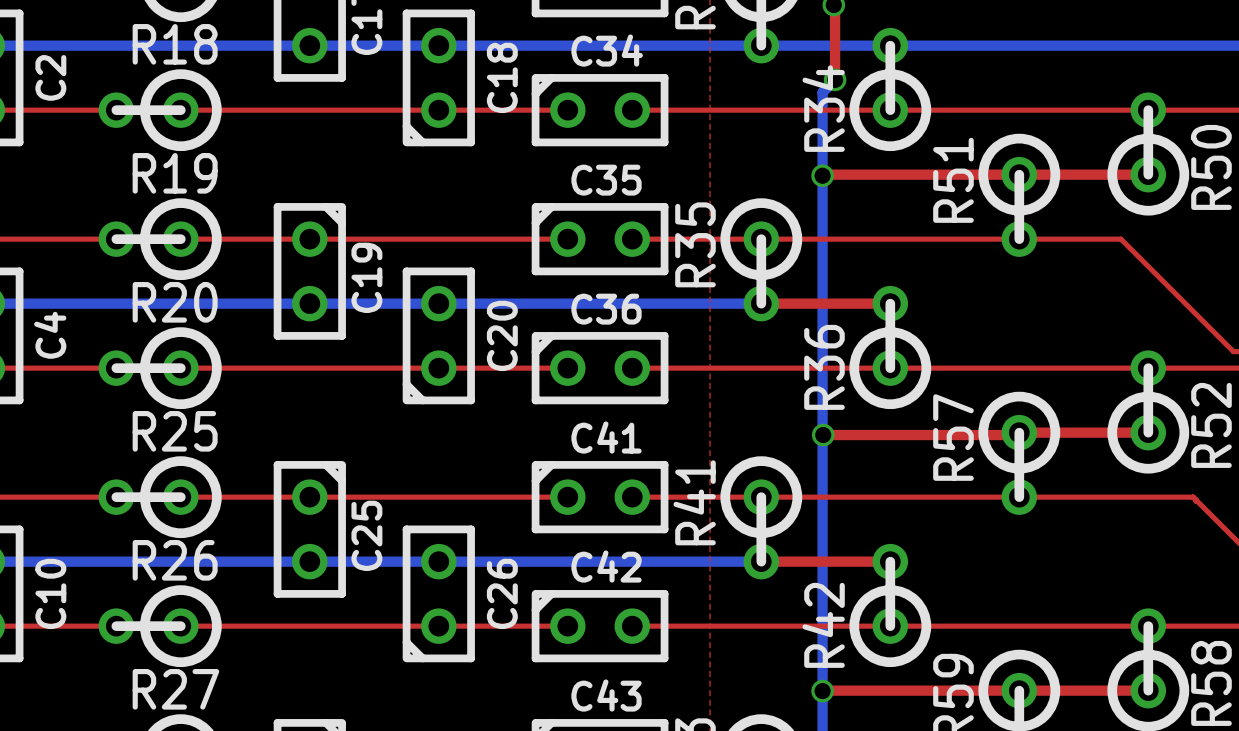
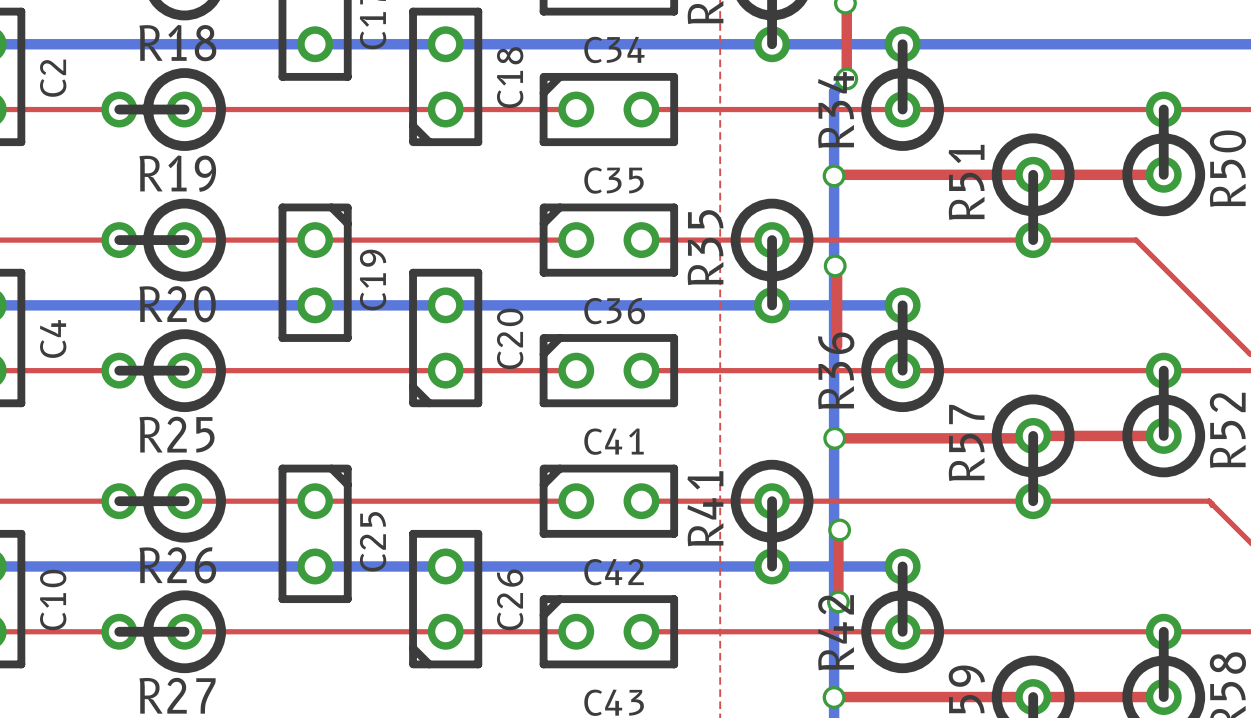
top track: none -> (835, 265) (837, 267) (837, 346)
via: none -> (835, 265)
bottom track: none -> (772, 305) (902, 305)
top track: (761, 303) (890, 303) -> none
top track: none -> (839, 529) (838, 601)
via: none -> (839, 529)
bottom track: none -> (772, 566) (902, 566)
top track: (761, 561) (890, 561) -> none
via: none -> (838, 601)

